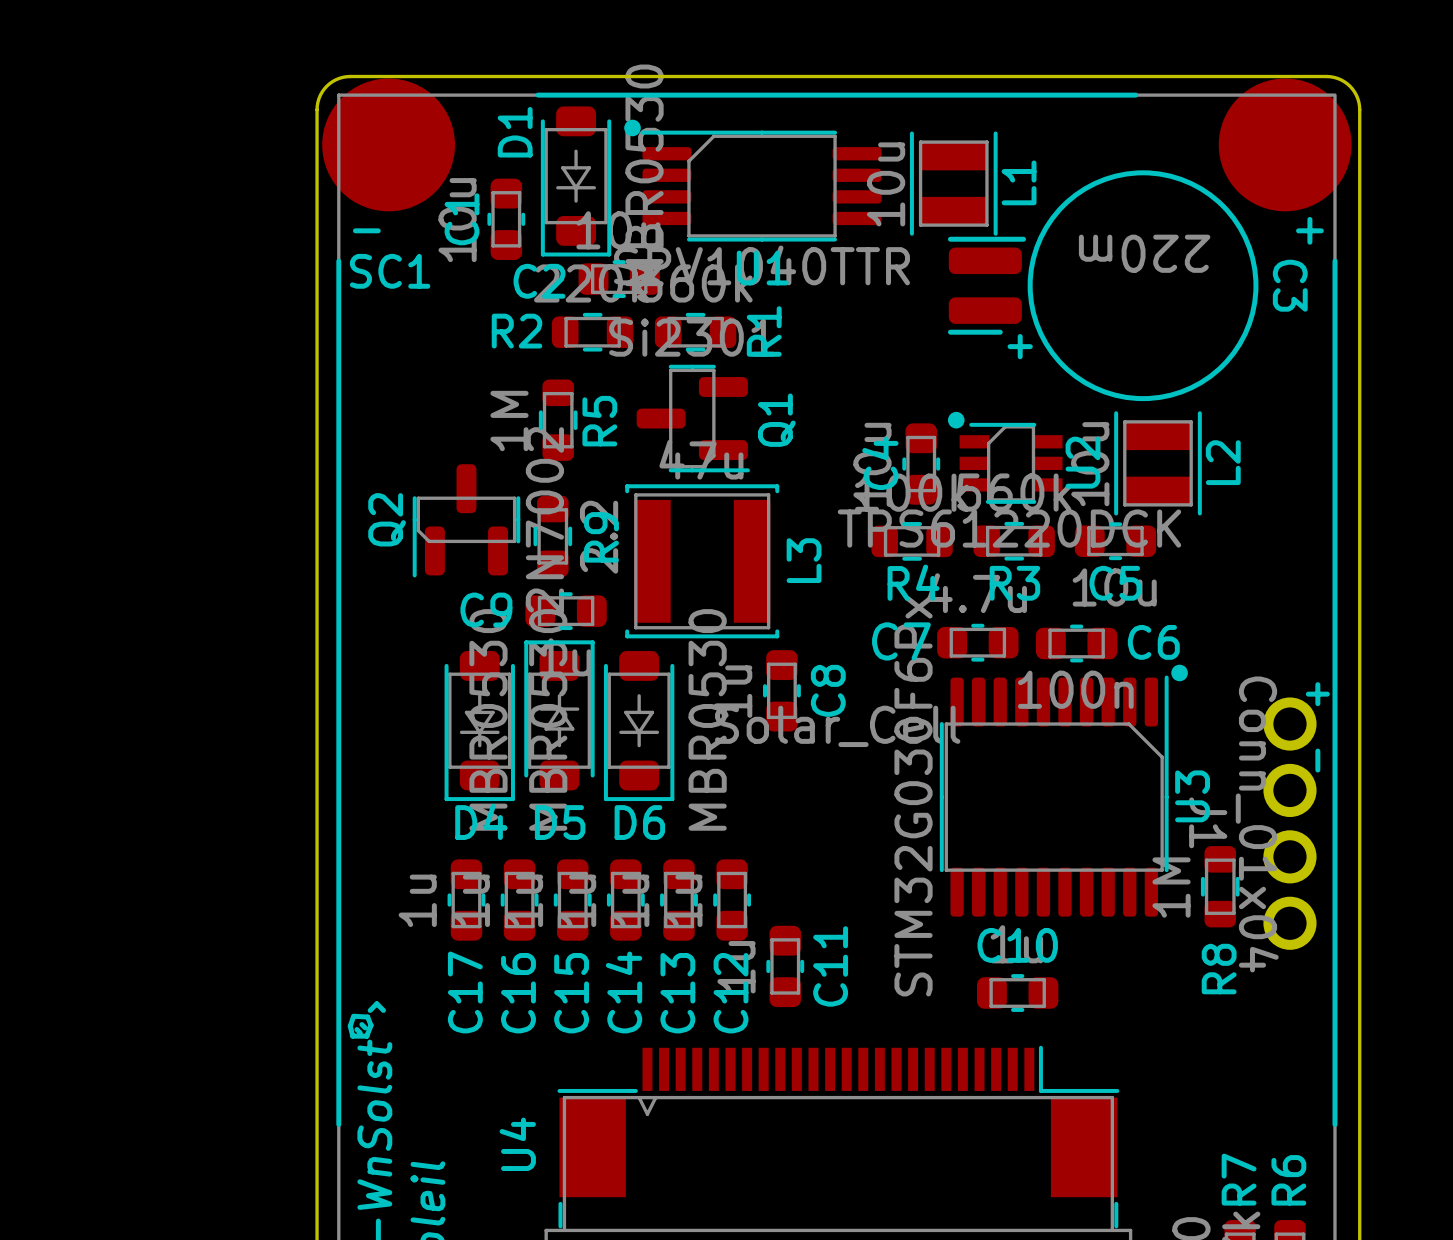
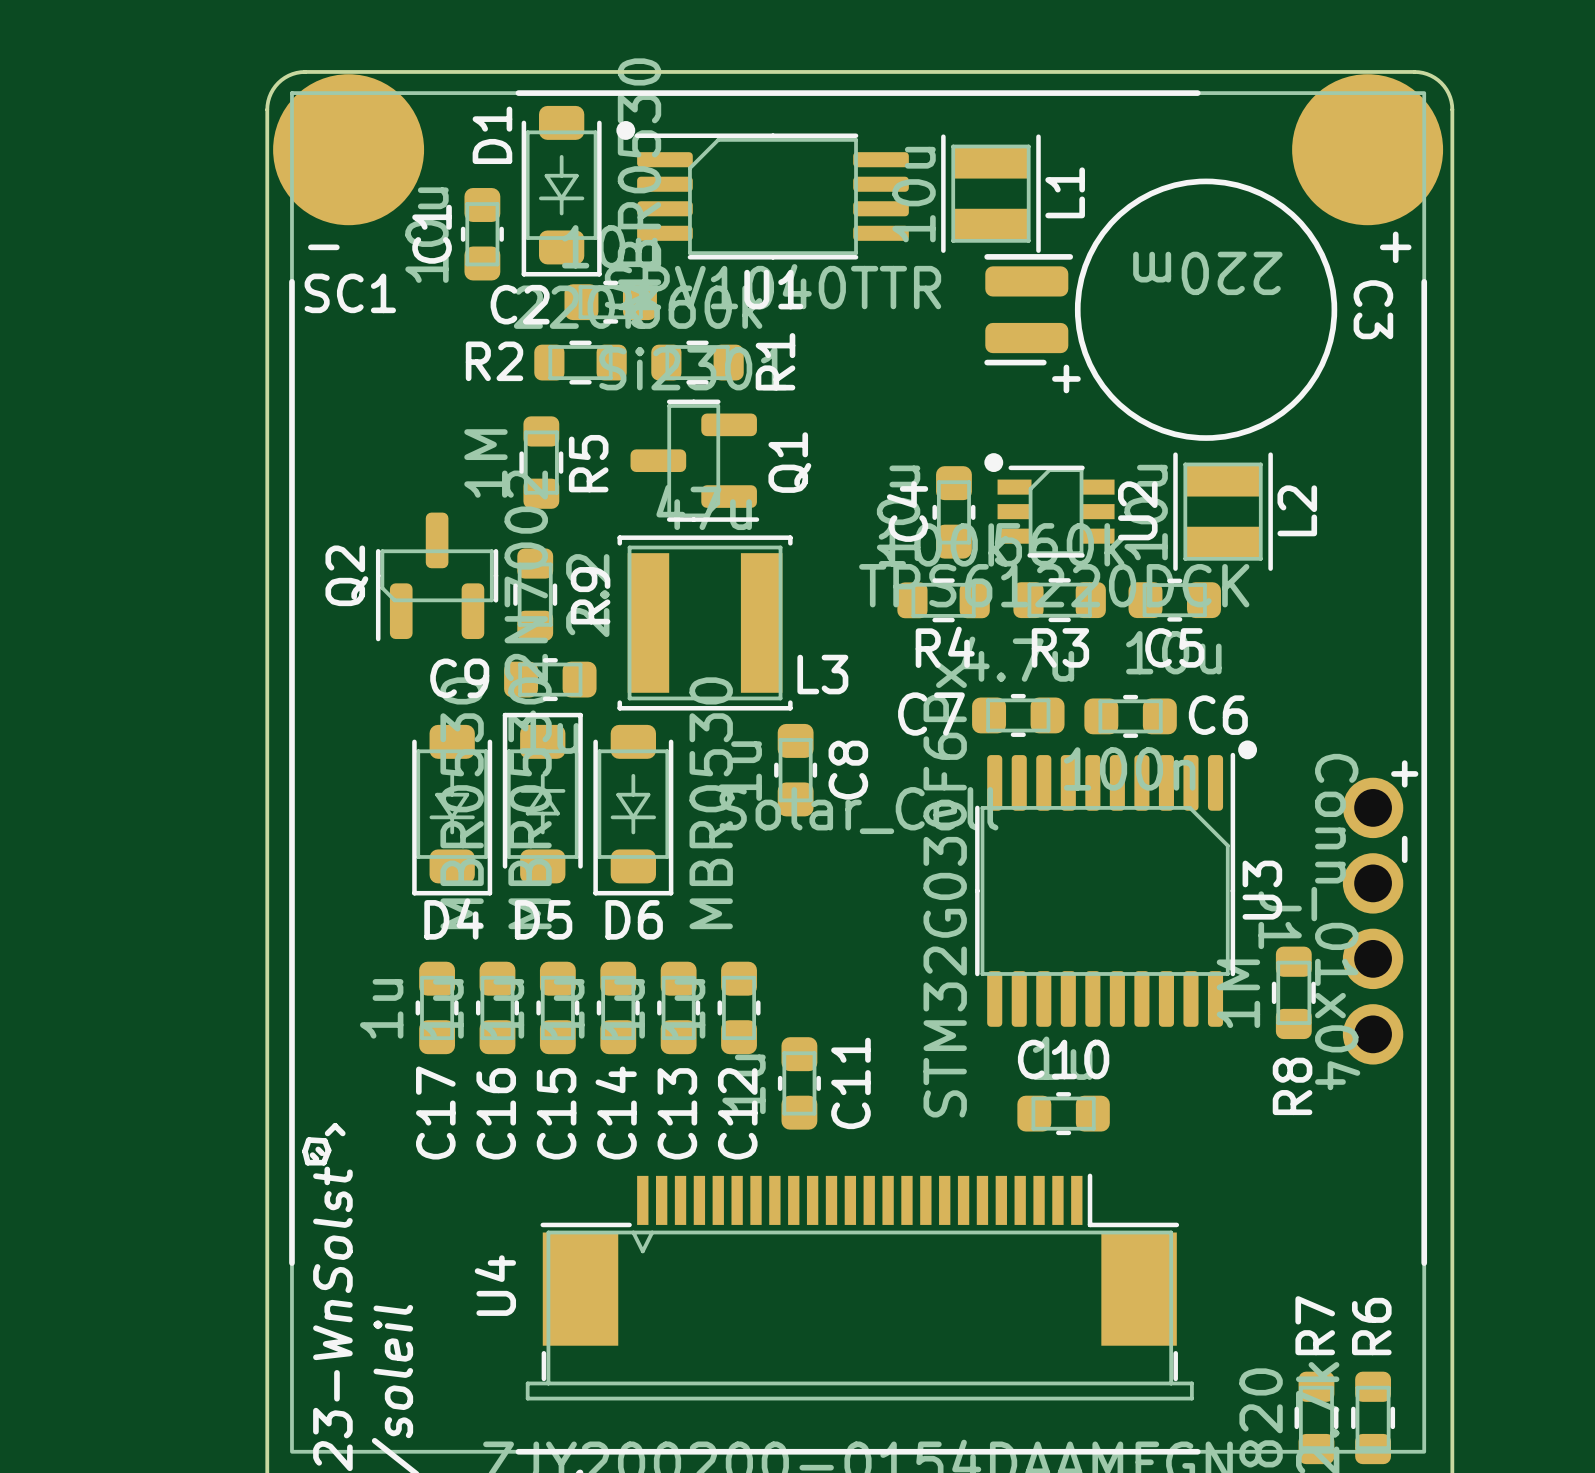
L3 name rotation: 0° (804, 560) -> 90° clockwise (822, 674)

